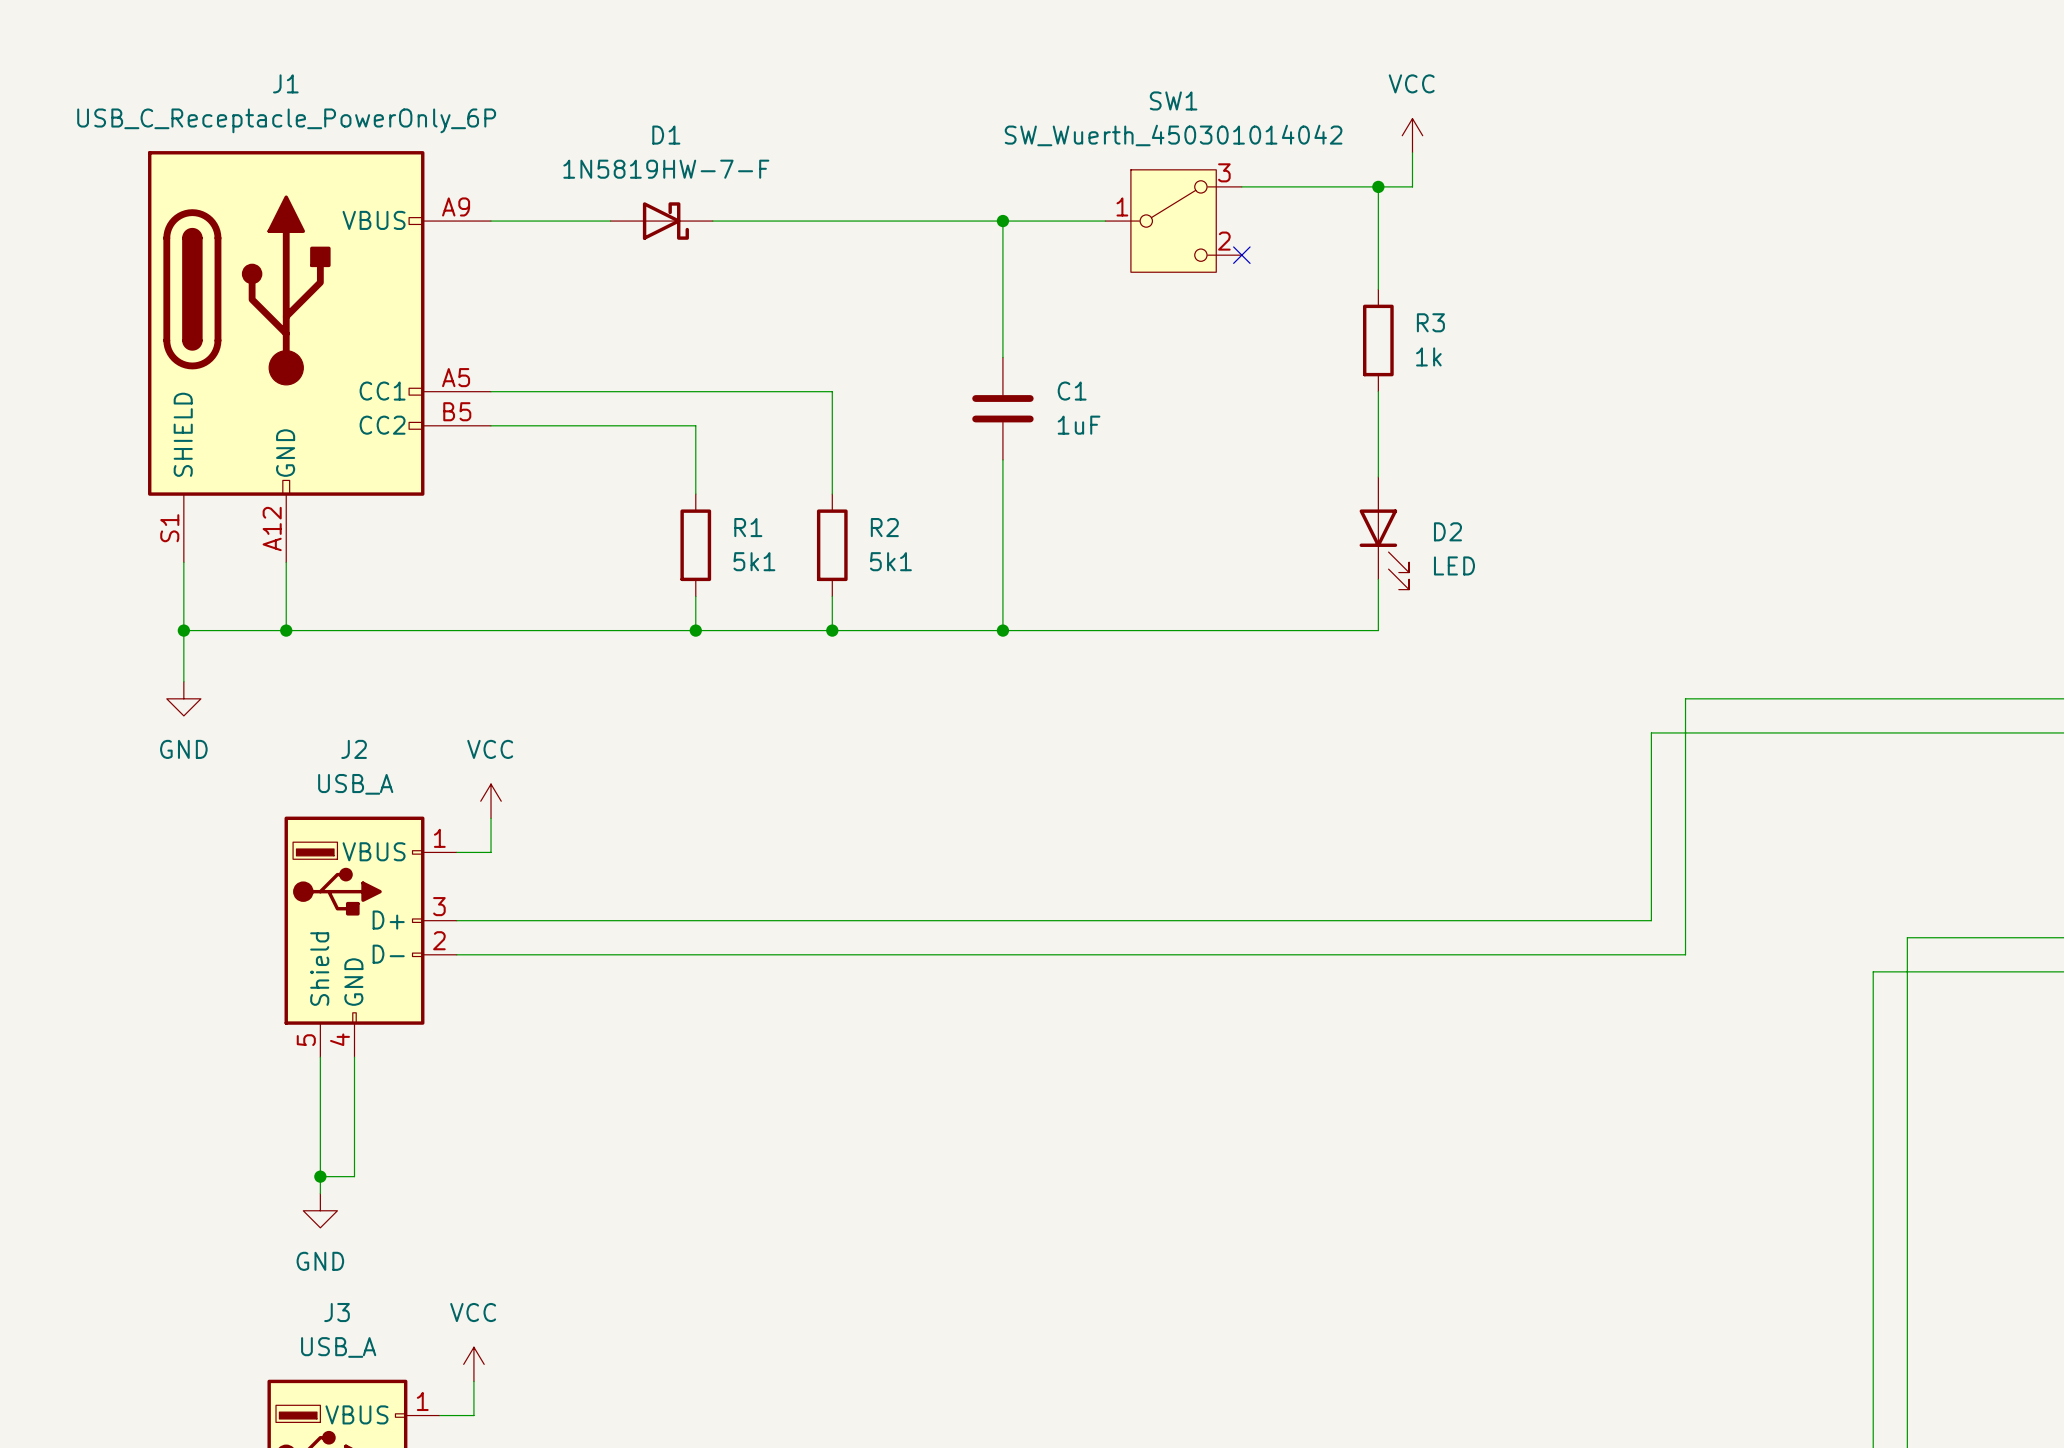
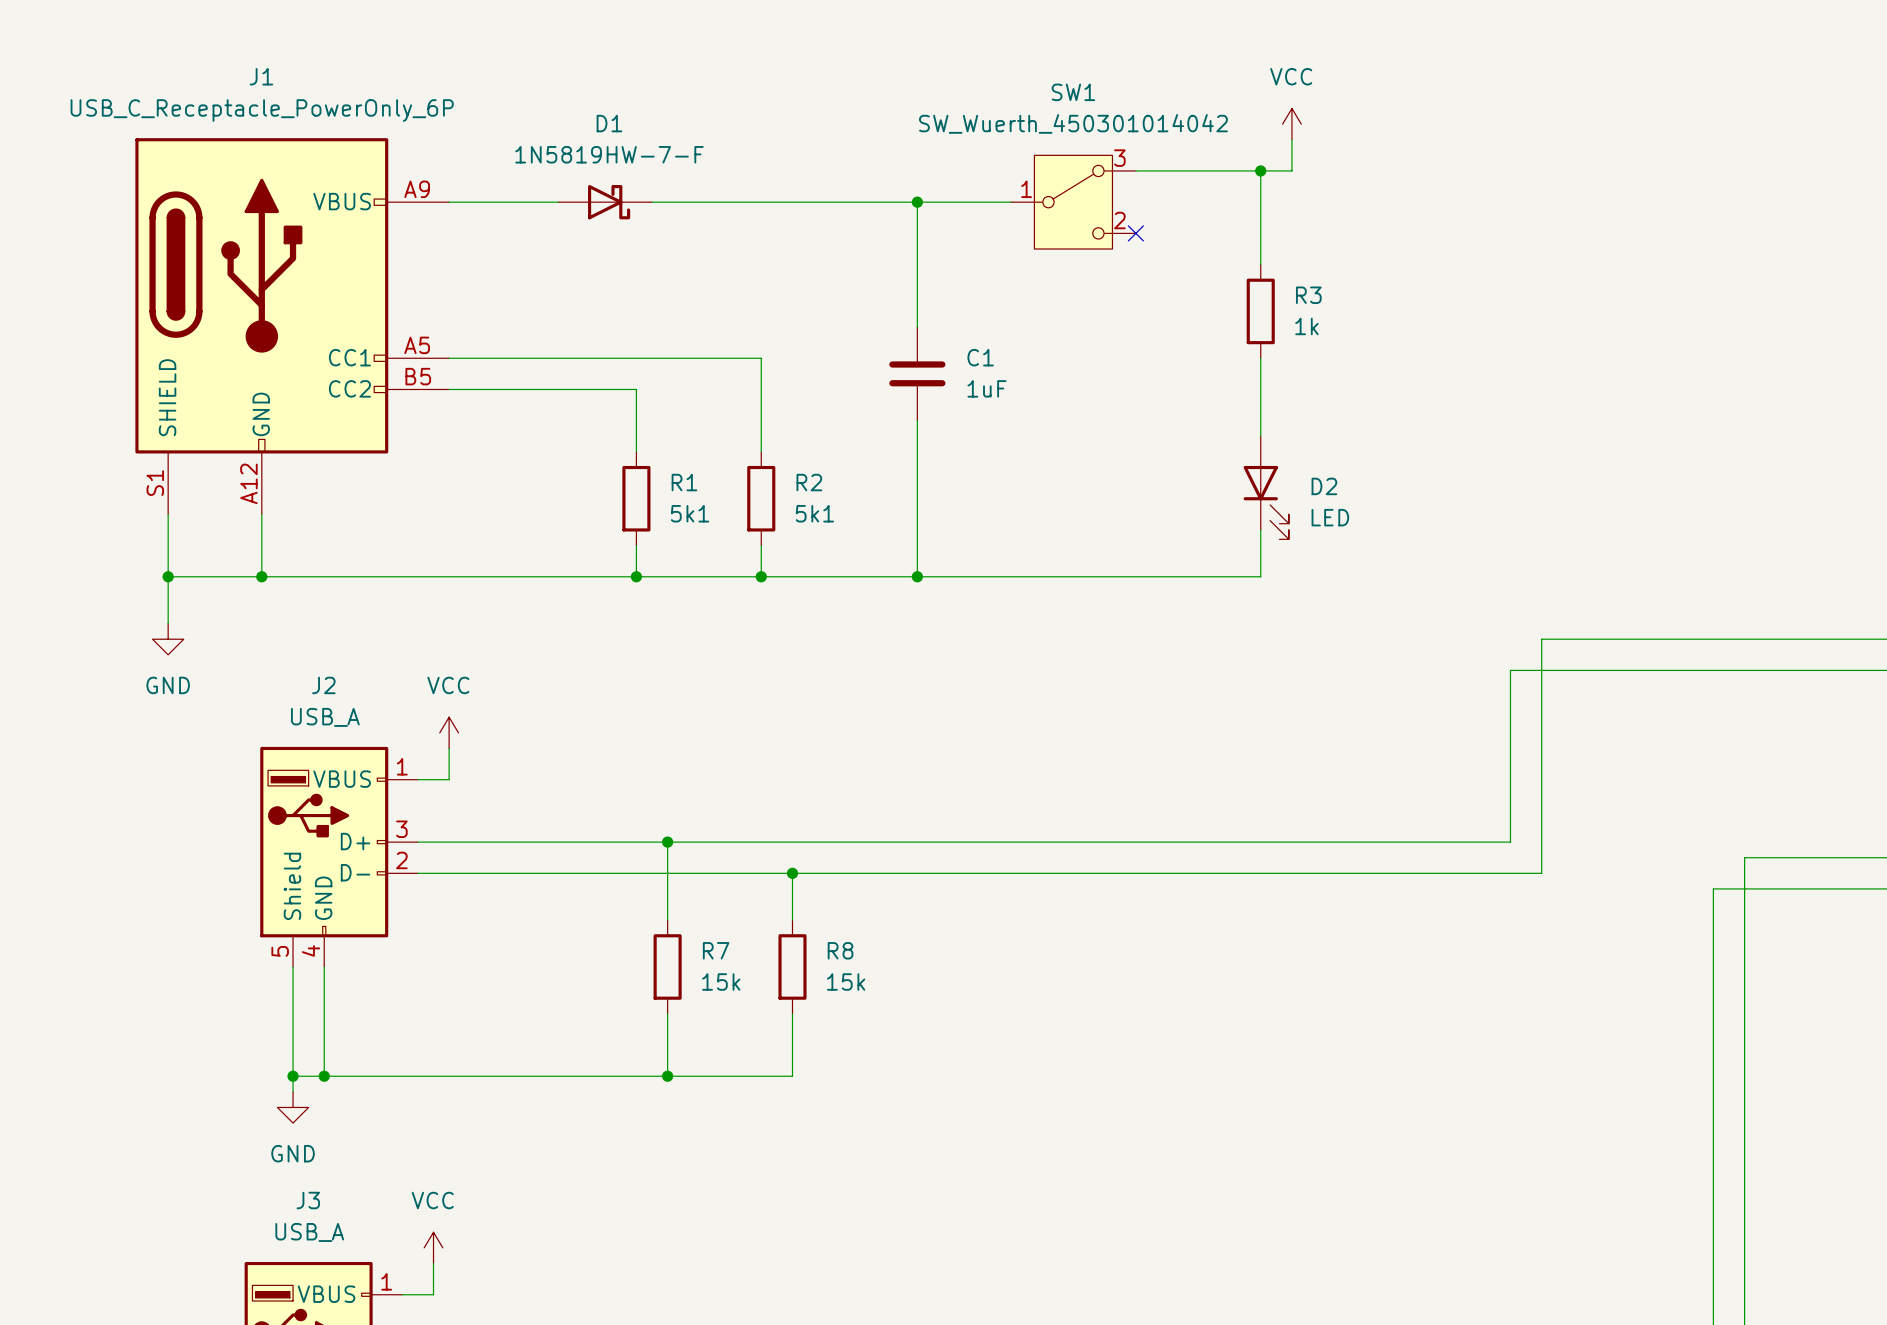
wire: none -> (667, 842) (667, 920)
junction: none -> (667, 842)
wire: none -> (792, 873) (792, 920)
junction: none -> (792, 873)
R7: none -> 15k (667, 966)
R8: none -> 15k (792, 966)
wire: none -> (667, 1013) (667, 1076)
wire: none -> (792, 1013) (792, 1076) (324, 1076)
junction: none -> (324, 1076)
junction: none -> (667, 1076)

